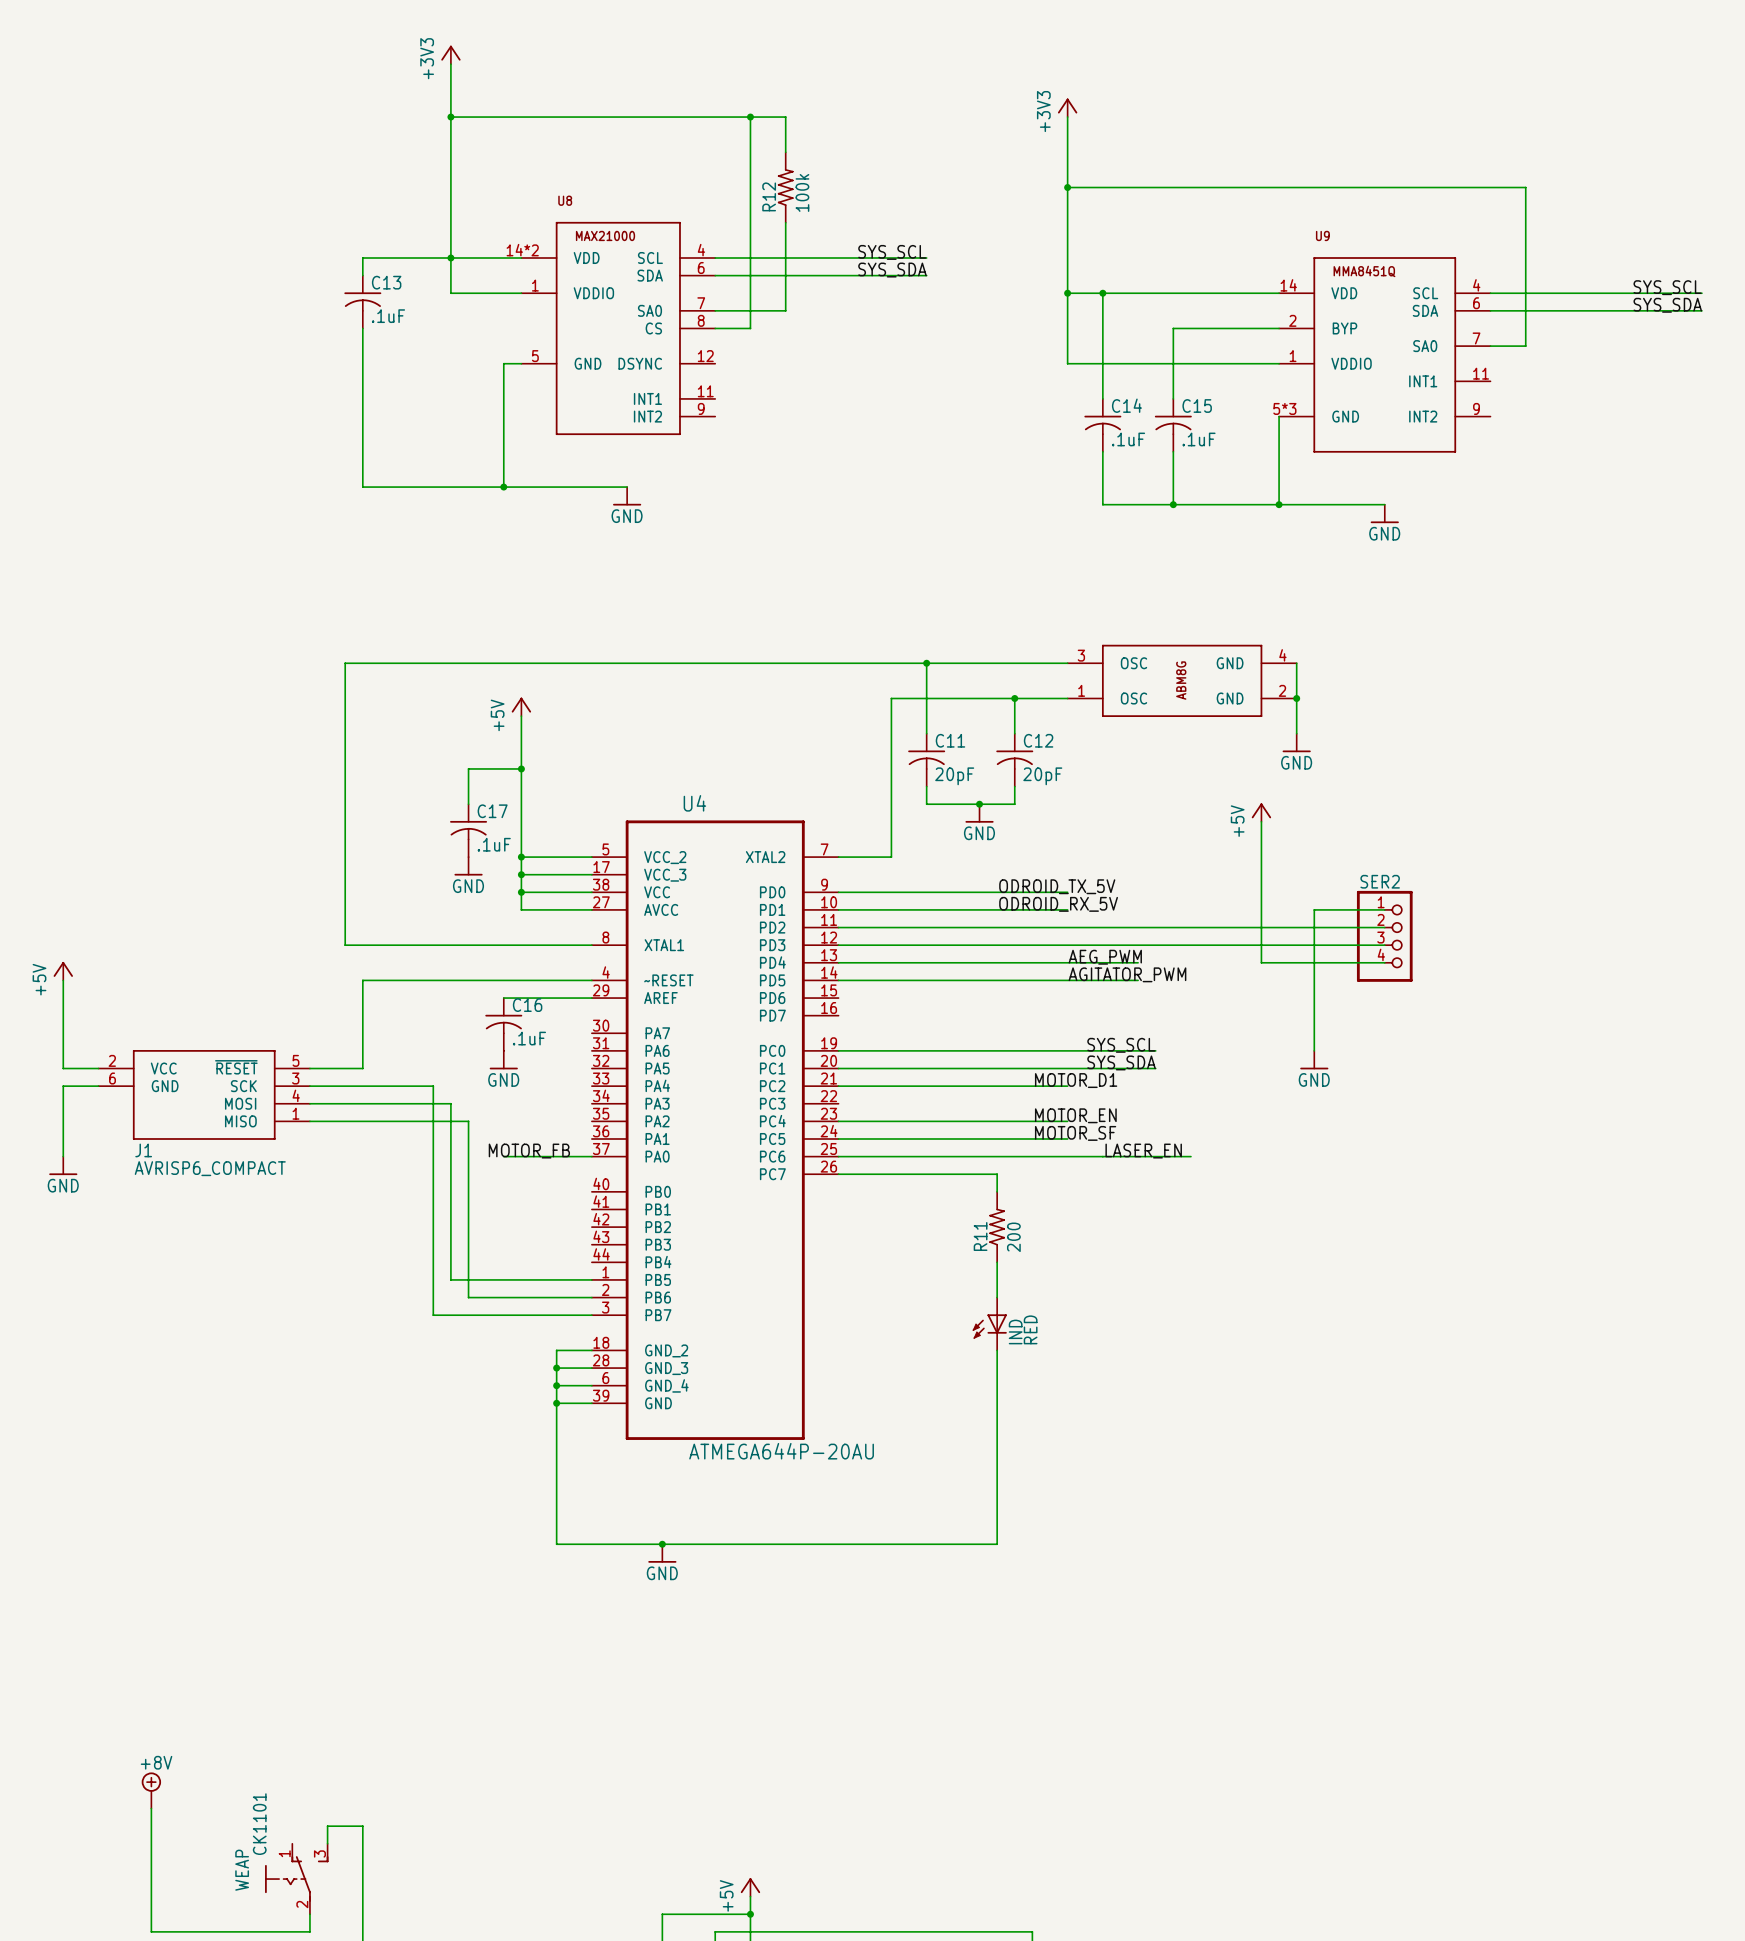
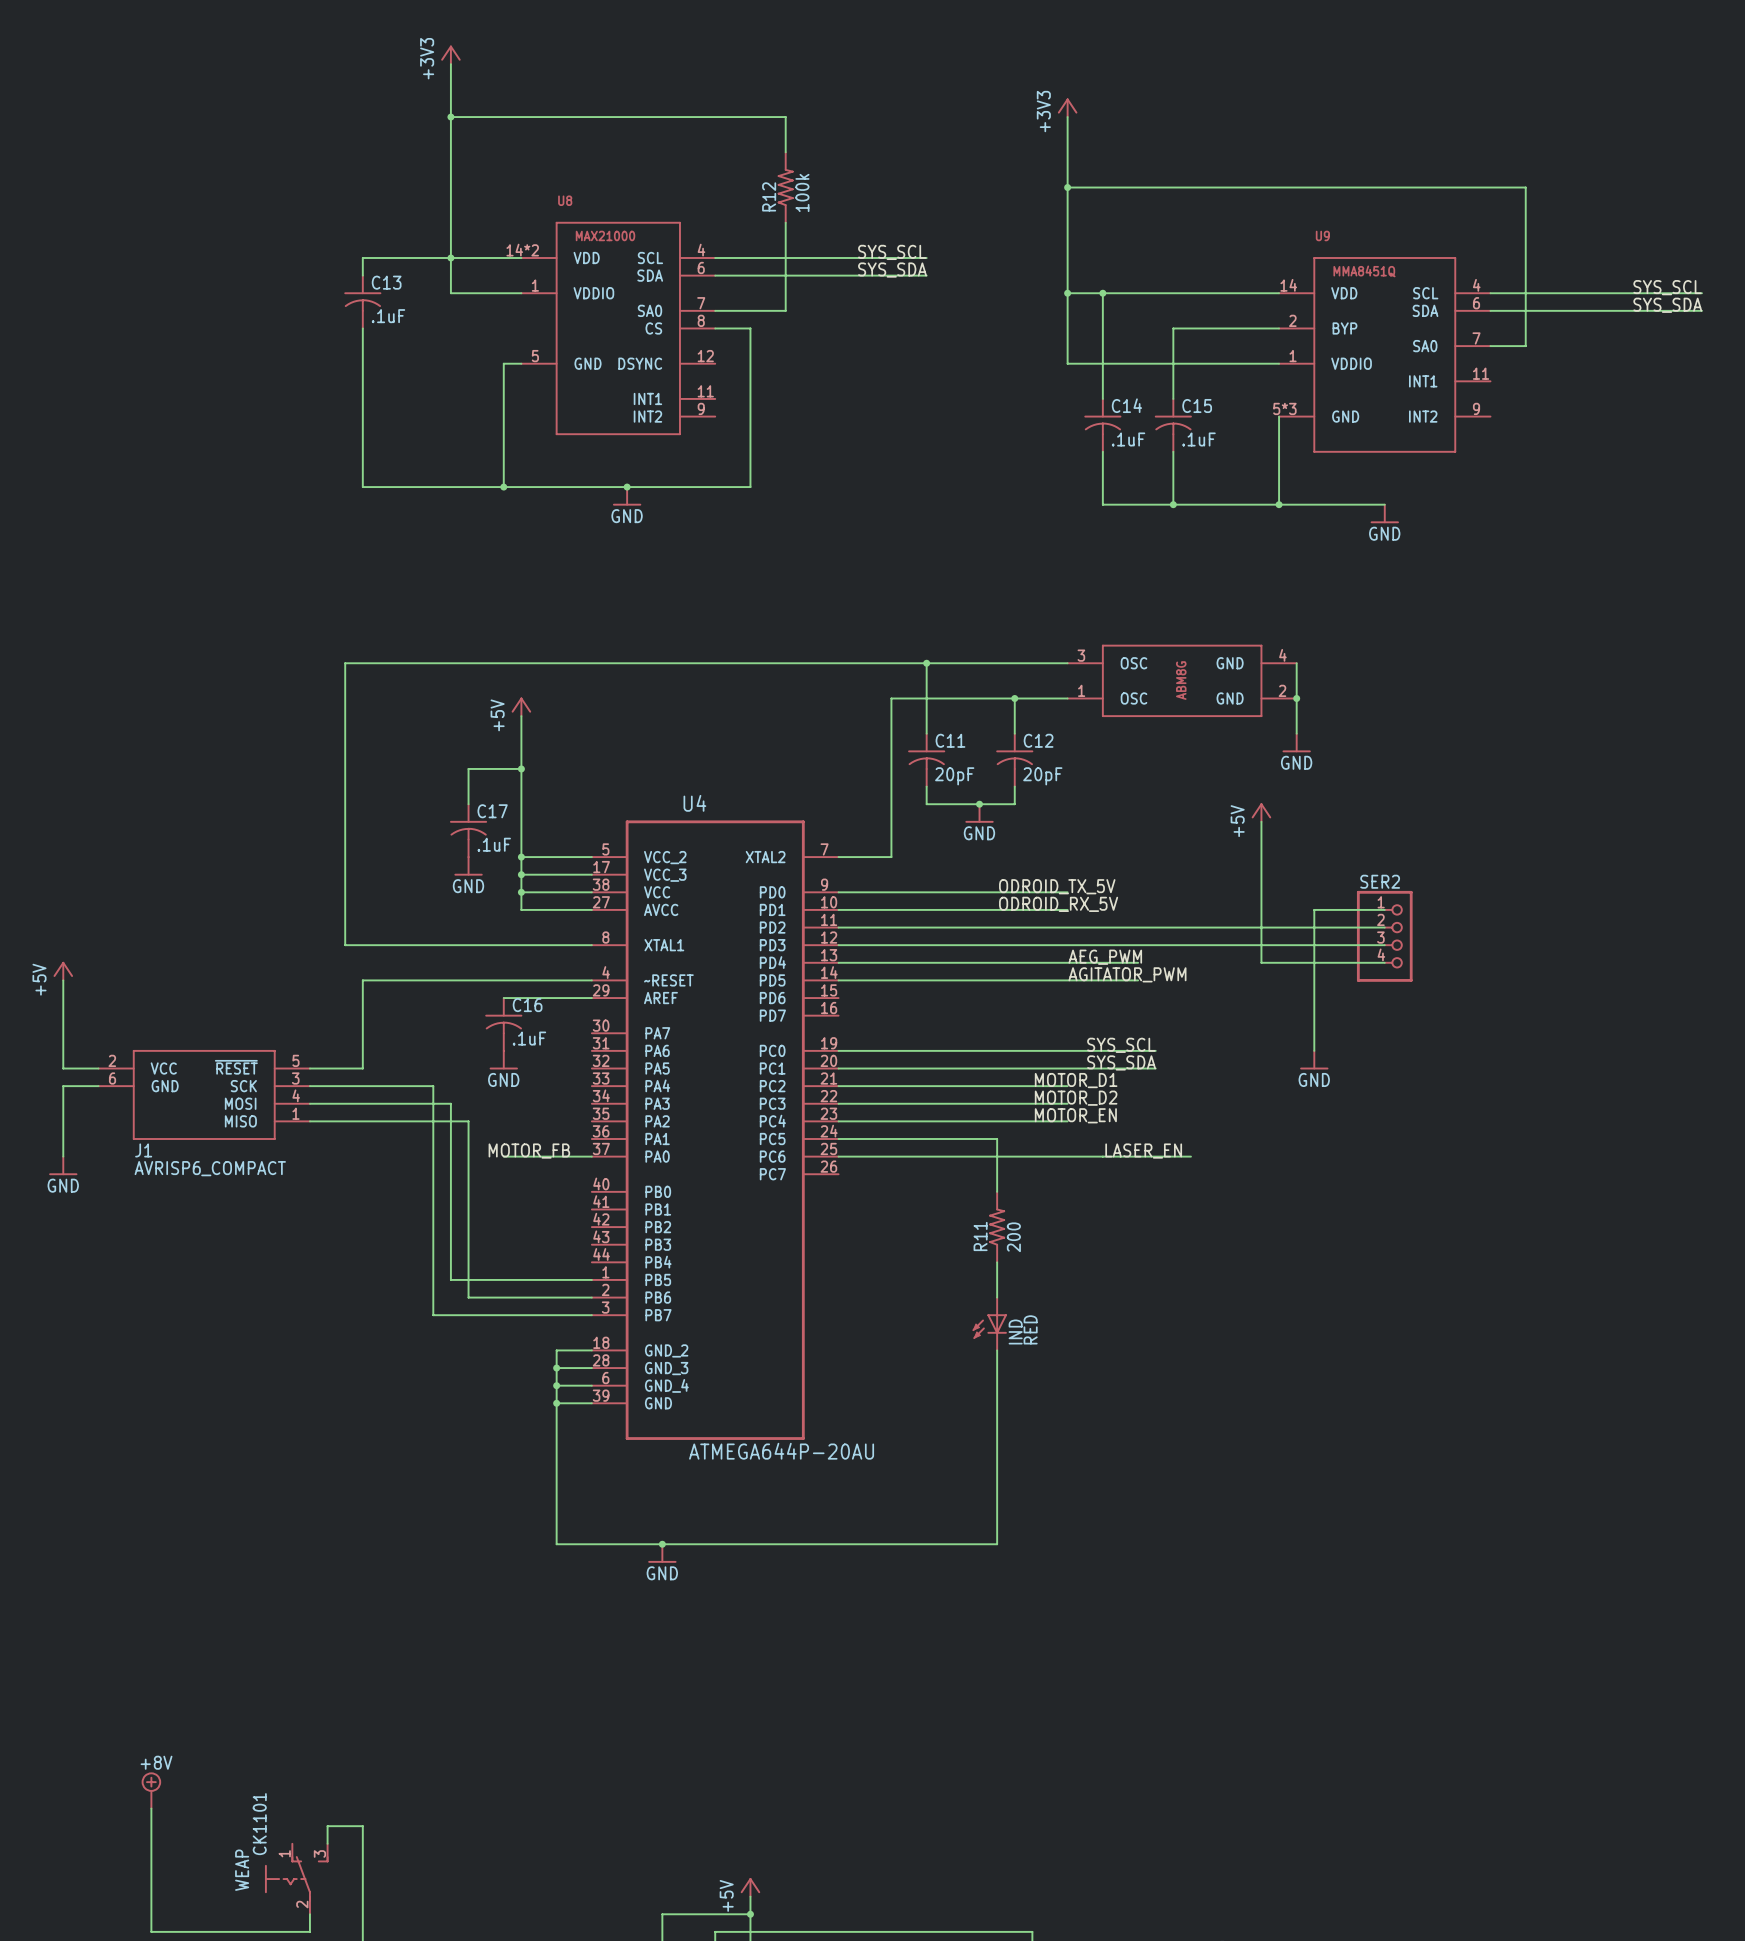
wire: (750, 117) (750, 328) -> (627, 487) (750, 487) (750, 328)
junction: (750, 117) -> none
junction: none -> (627, 487)
label: none -> MOTOR_D2 (1076, 1098)
wire: none -> (838, 1103) (1067, 1103)
label: MOTOR_SF (1075, 1133) -> none
wire: (997, 1138) (1067, 1138) -> (997, 1138) (997, 1174)
wire: (838, 1174) (997, 1174) -> none

